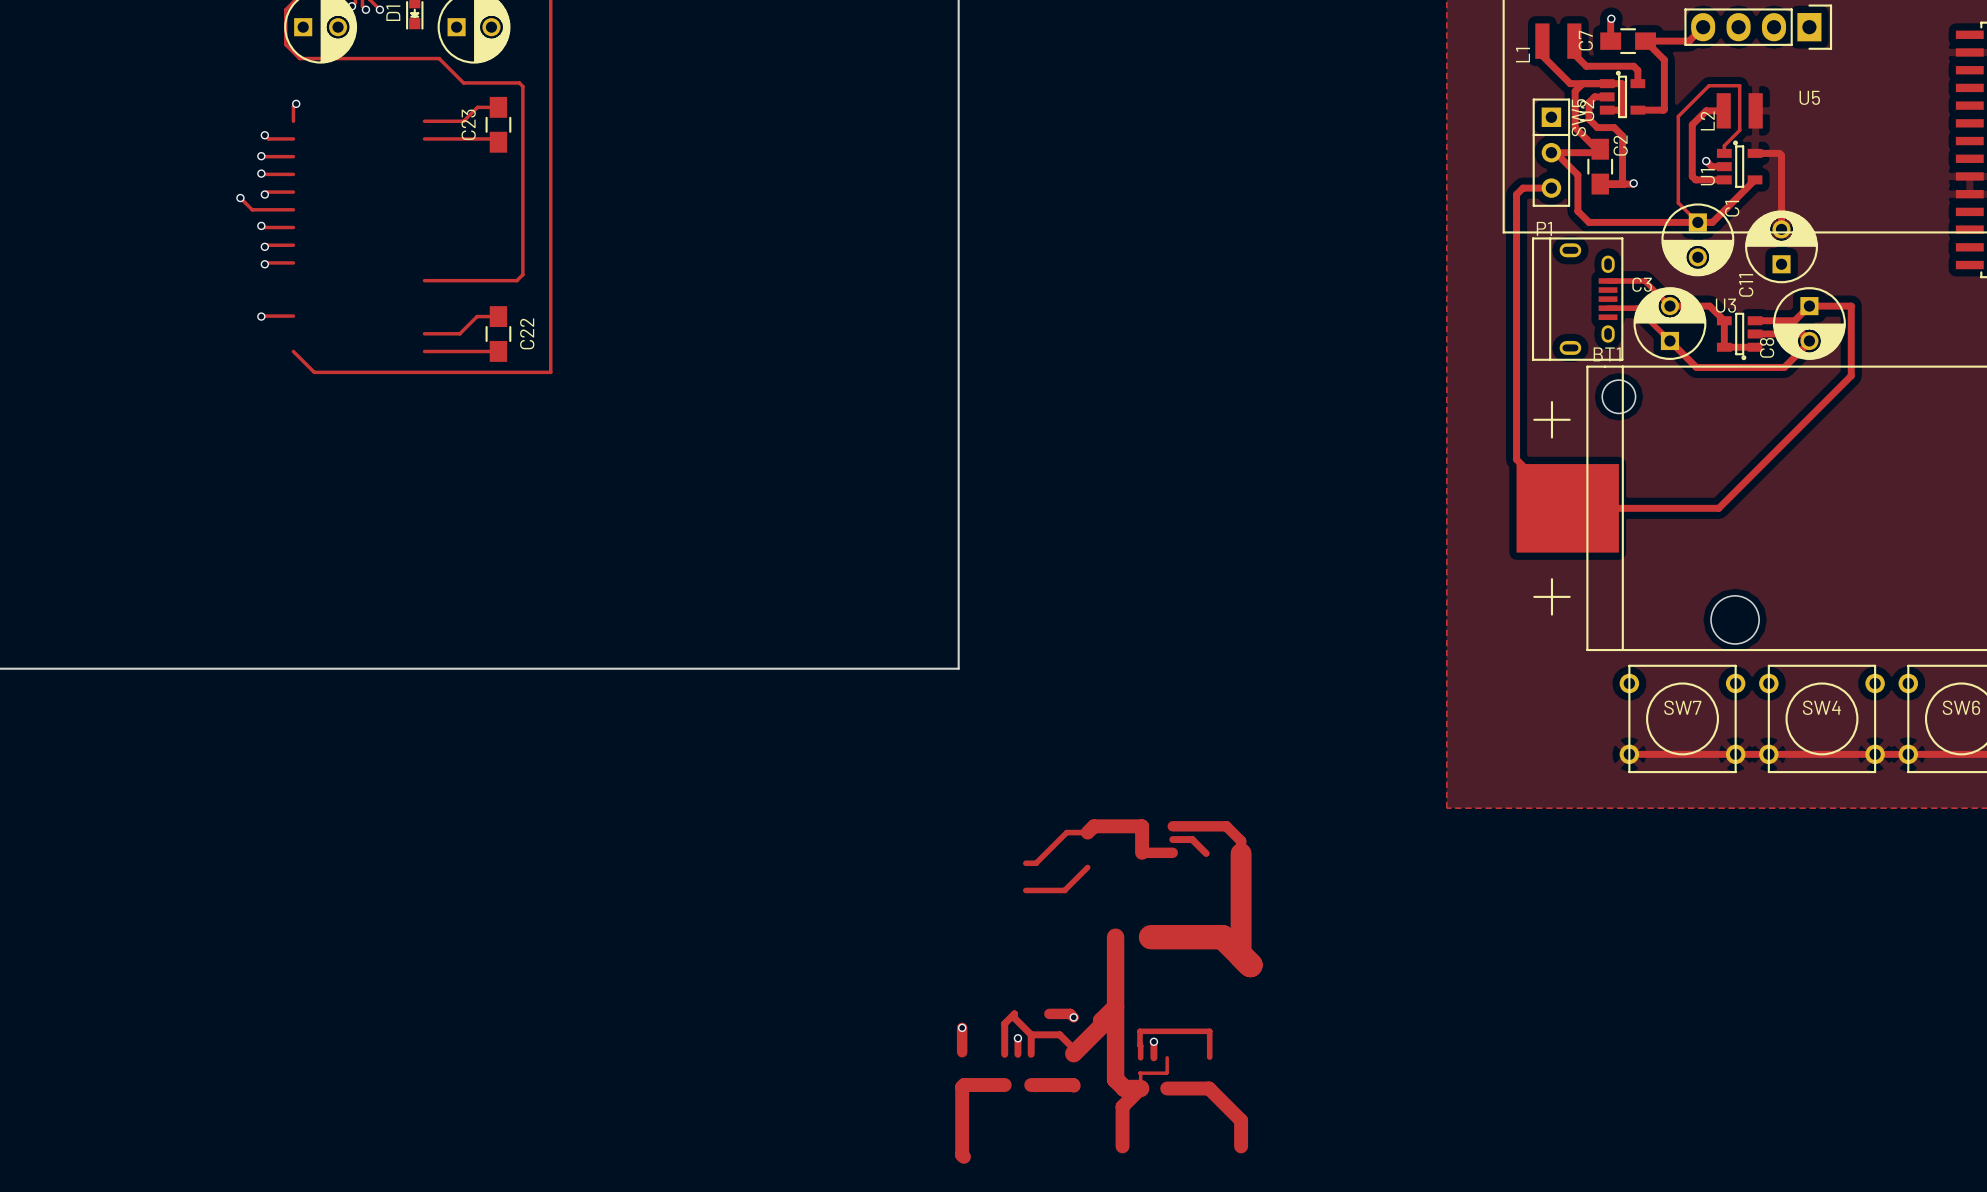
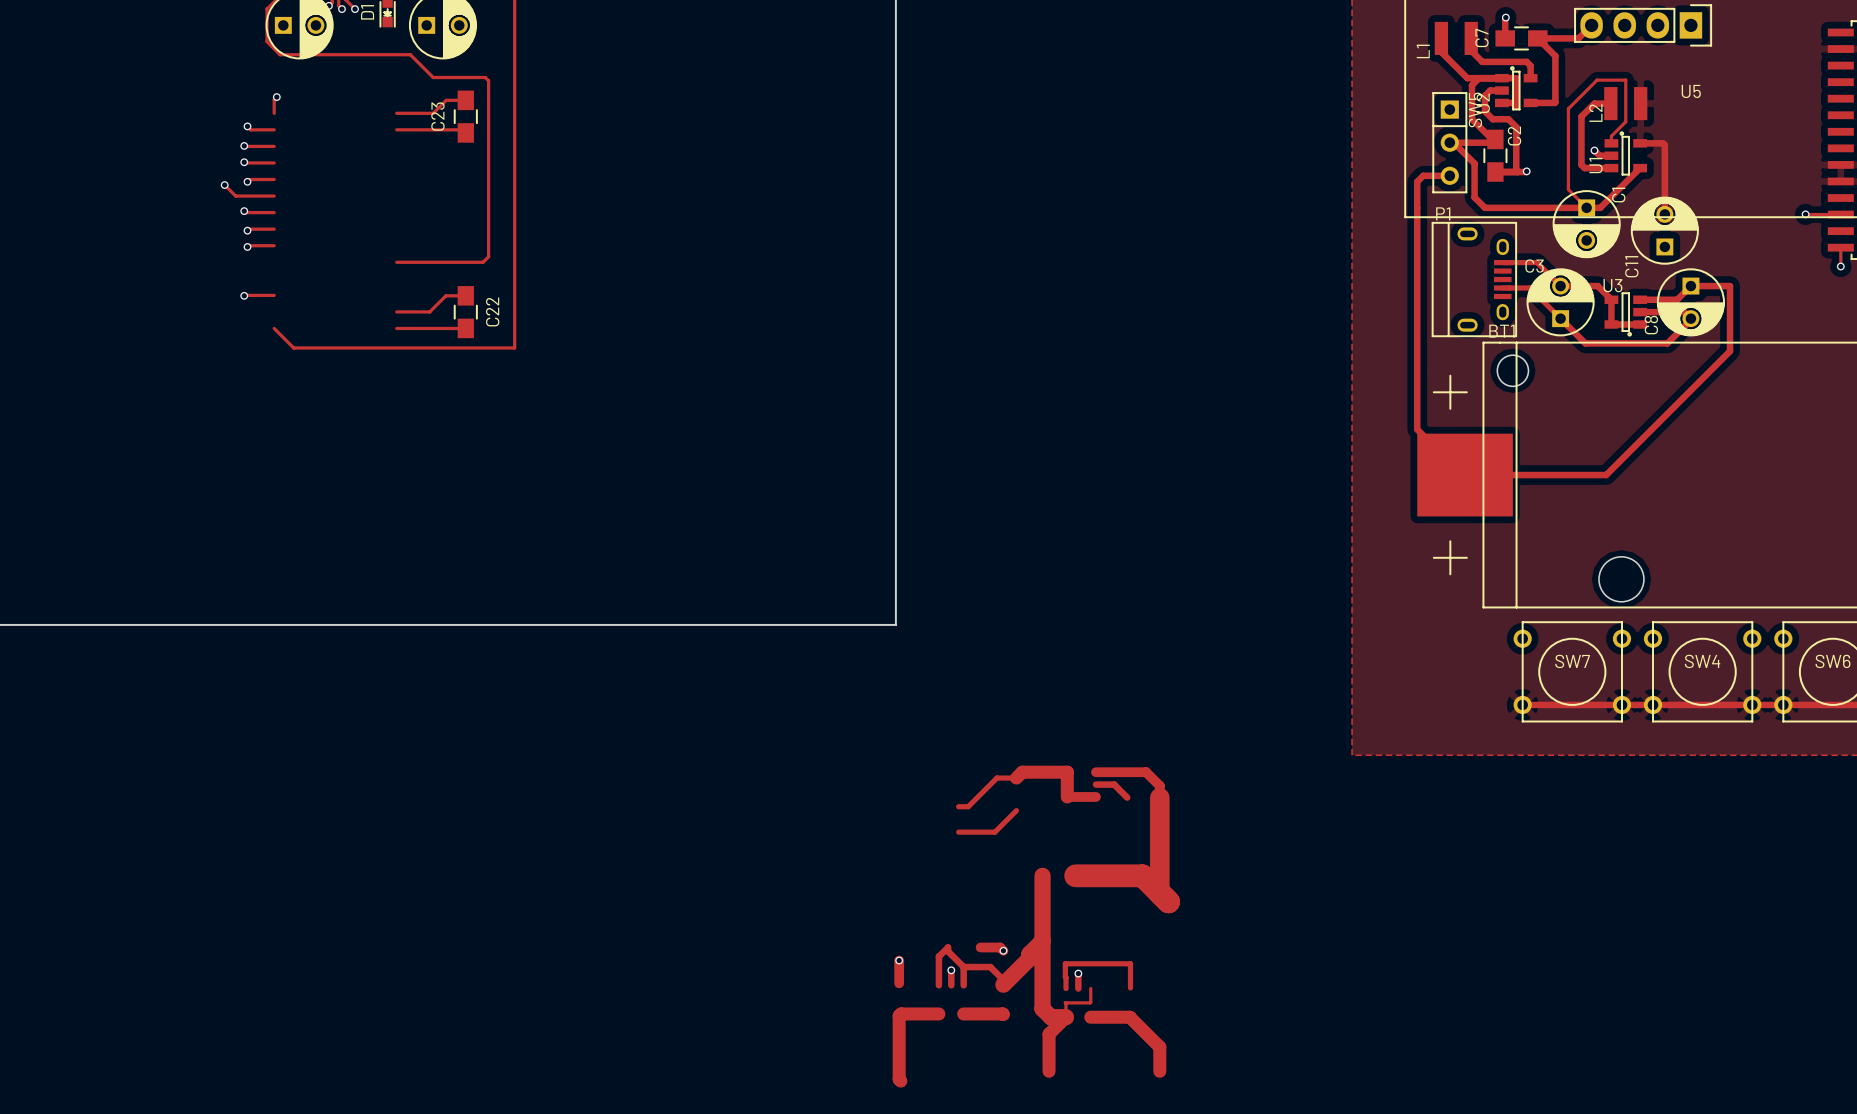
track: none -> (1805, 214) (1840, 214)
via: none -> (1805, 214)
track: none -> (1840, 247) (1840, 266)
via: none -> (1840, 266)

